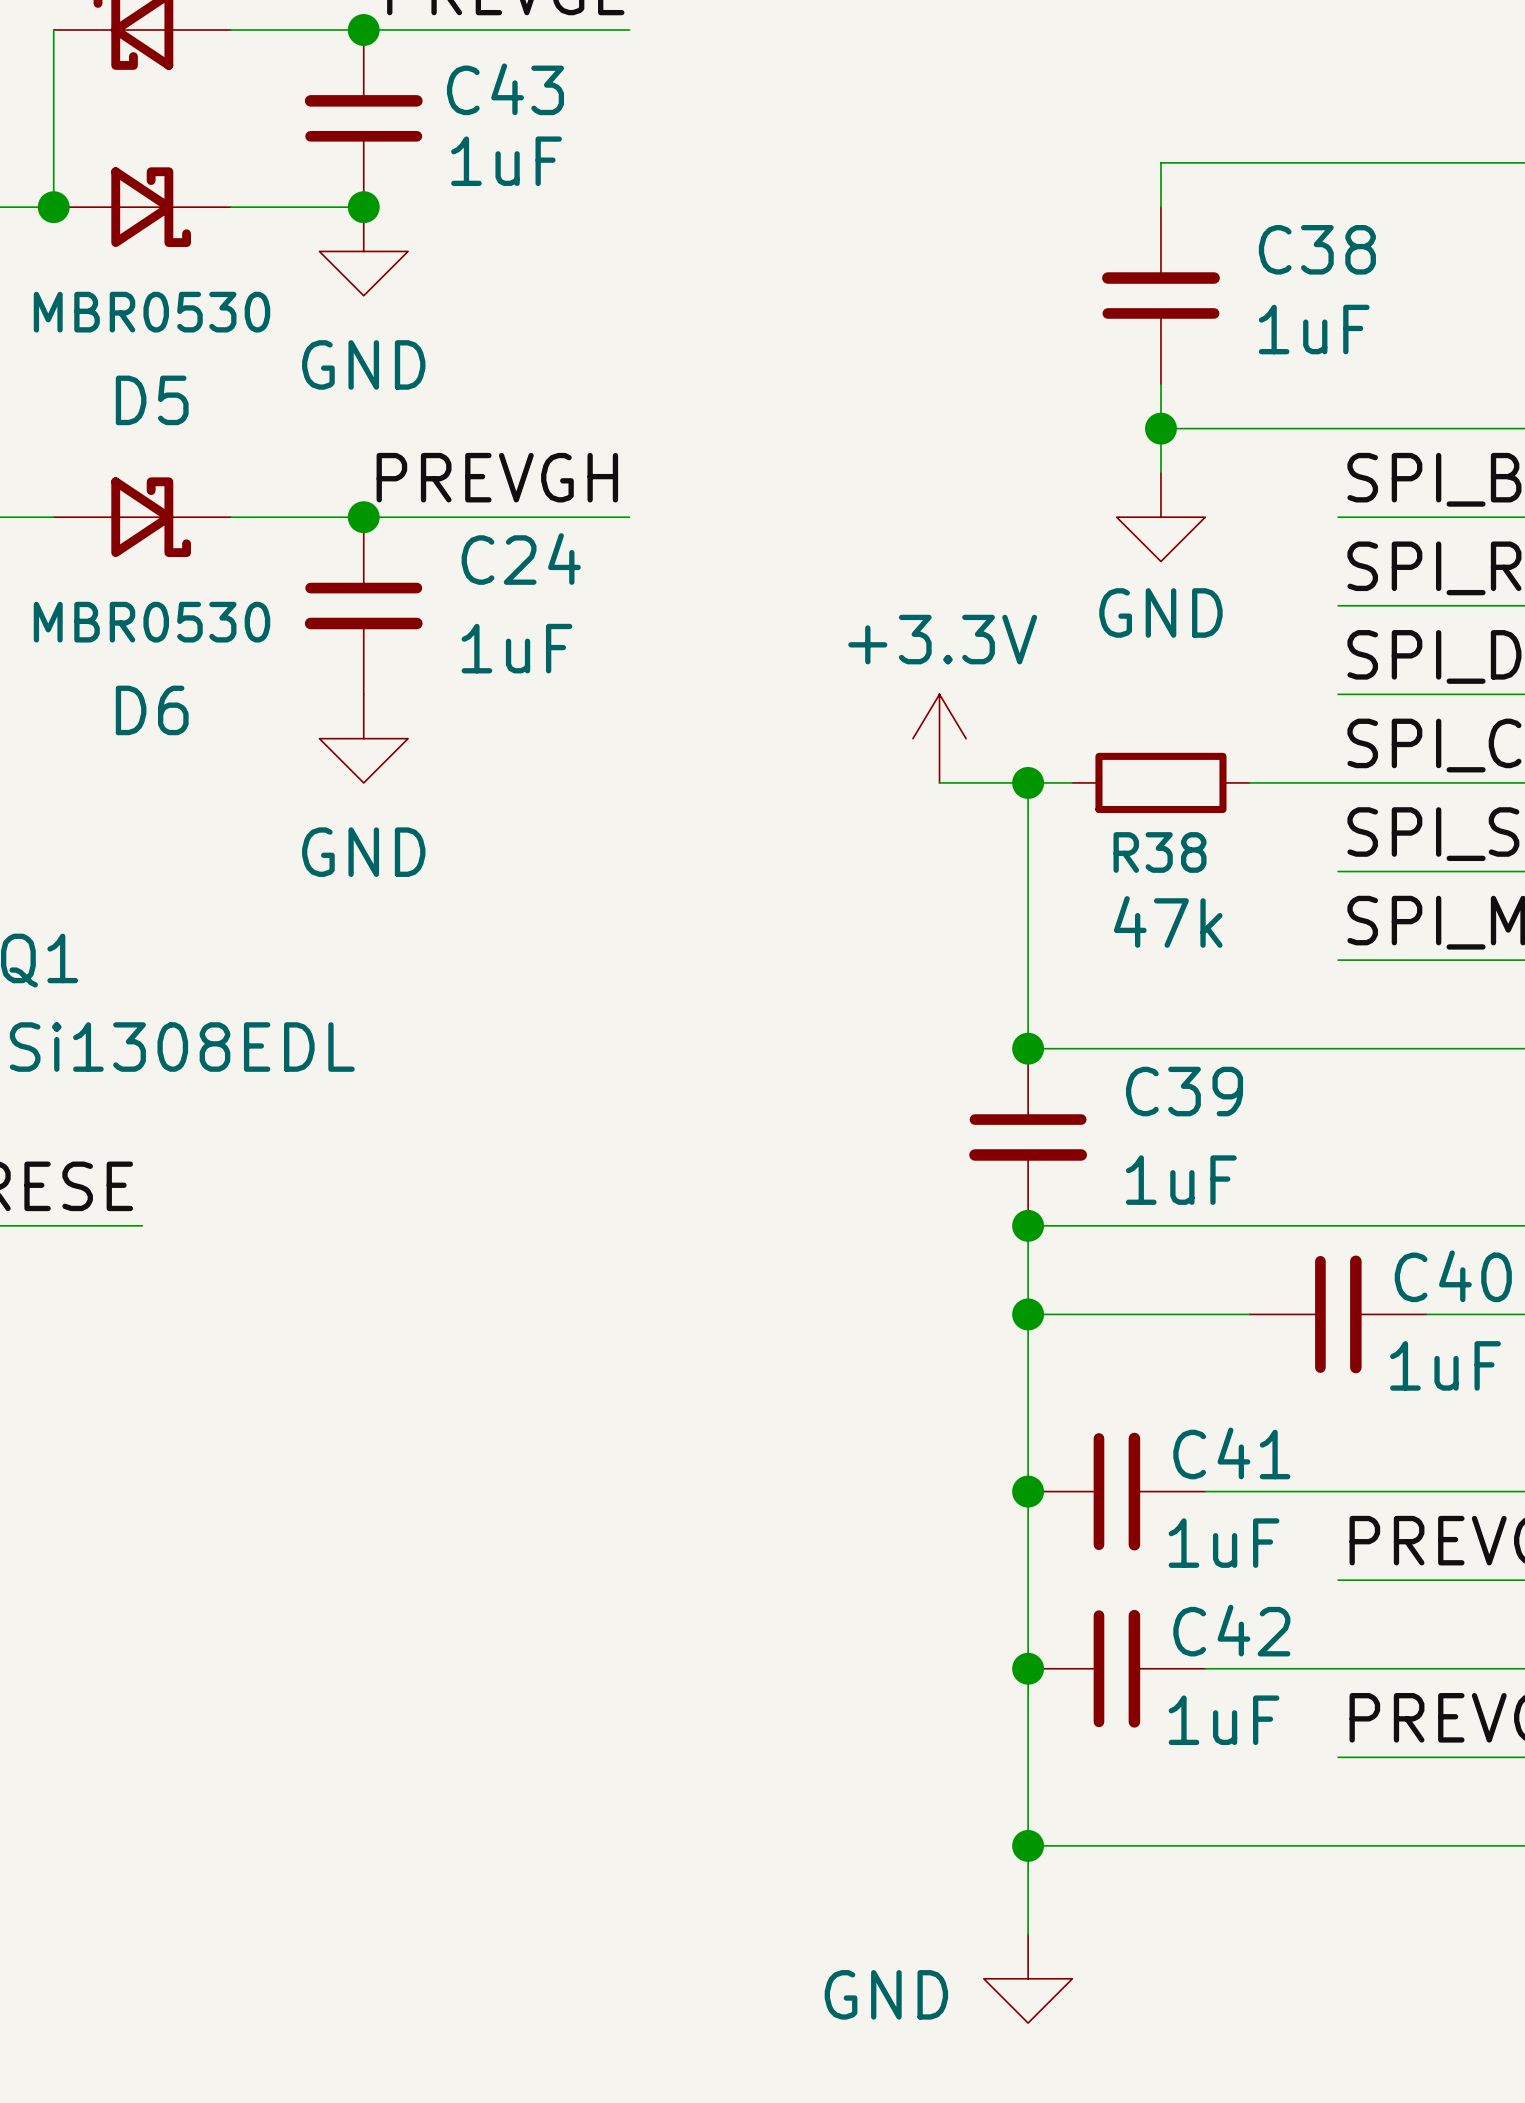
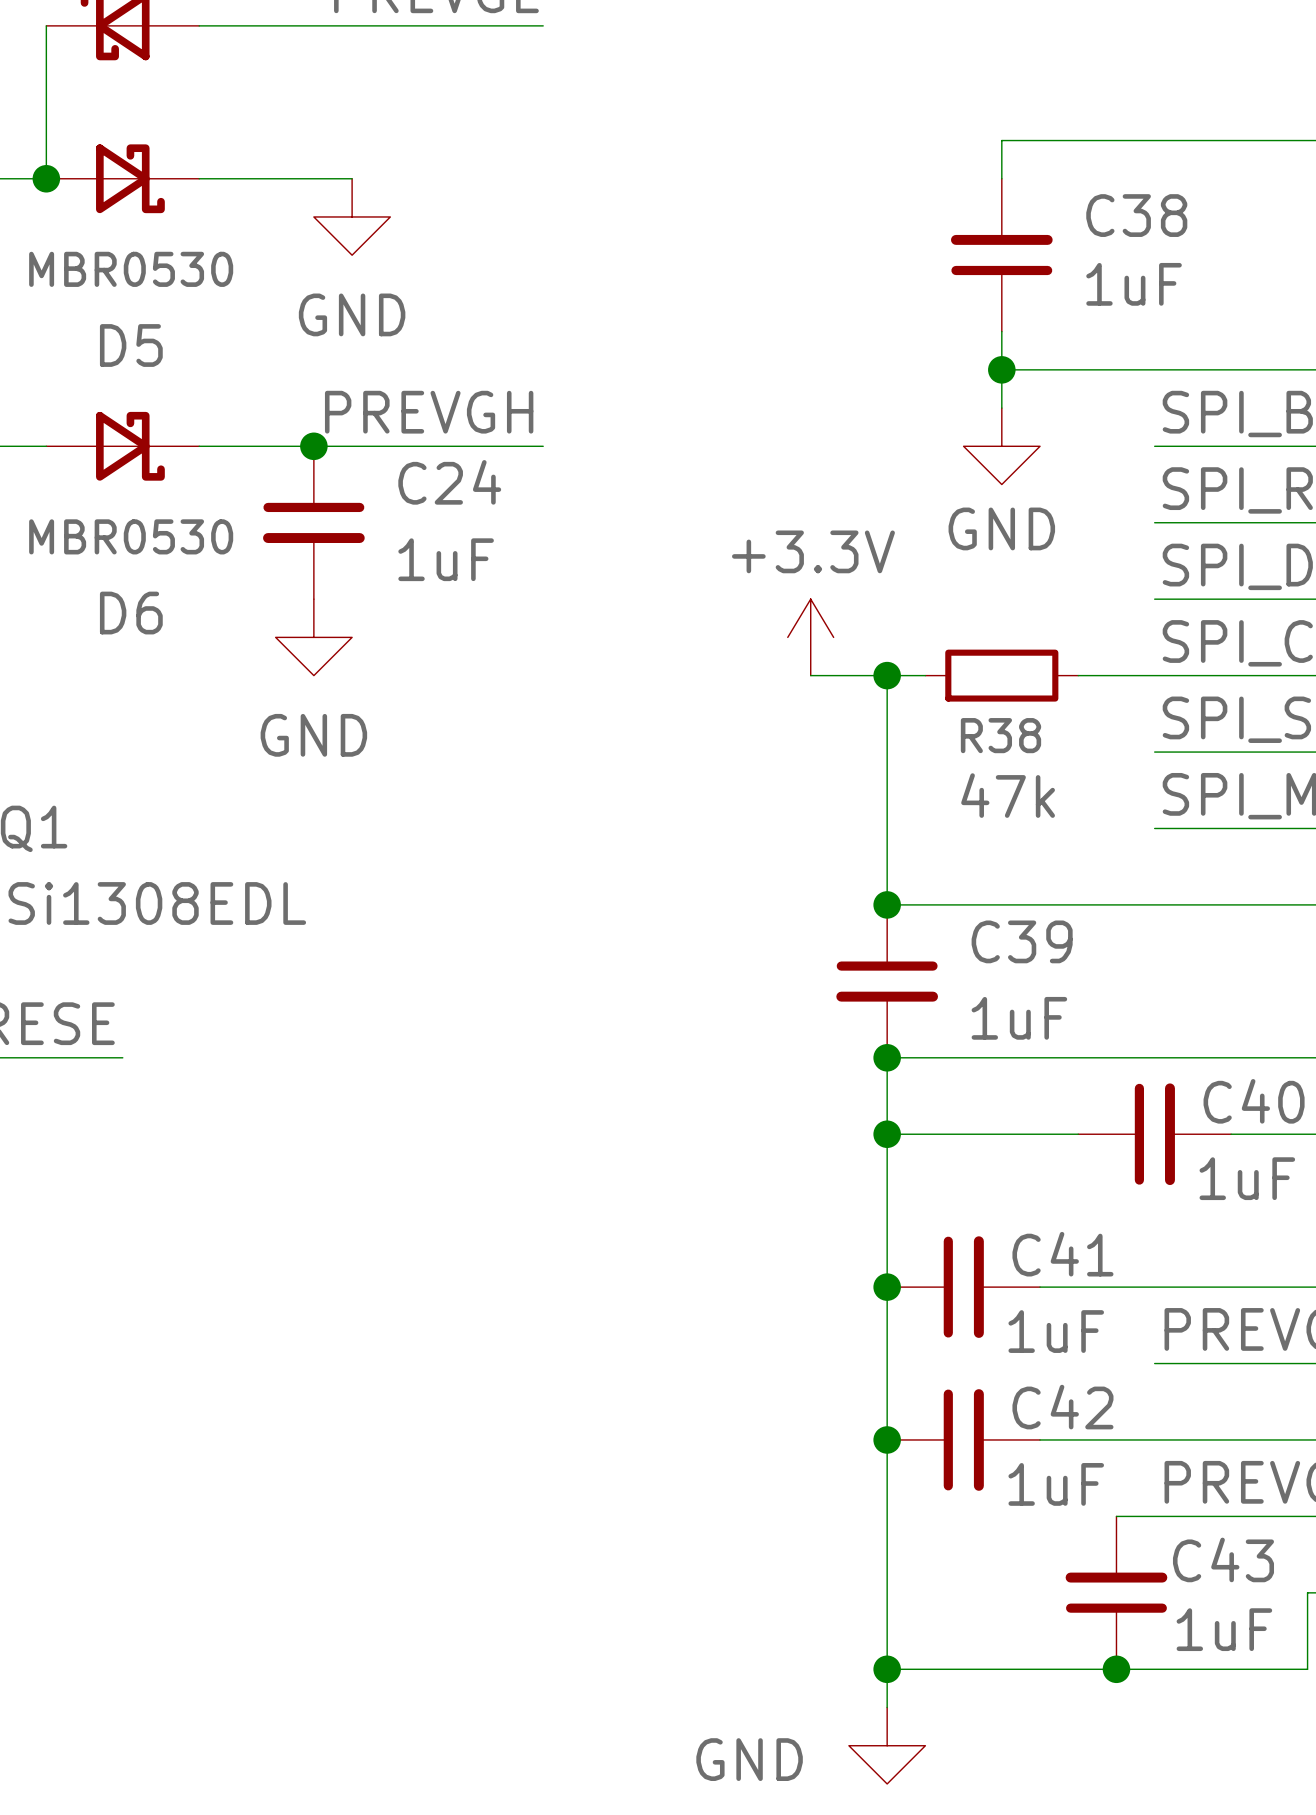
junction: (363, 30) -> none
C43 name position: C43 (505, 89) -> C43 (1223, 1559)
C43 position: (363, 118) -> (1116, 1592)
C43 value position: 1uF (506, 161) -> 1uF (1224, 1629)
wire: none -> (313, 178) (352, 178)
junction: (363, 207) -> none
power symbol position: GND (363, 251) -> GND (352, 216)
wire: none -> (1116, 1516) (1154, 1516)
wire: (1028, 1845) (1515, 1845) -> (887, 1707) (887, 1669) (1307, 1669) (1307, 1592)
junction position: (1028, 1845) -> (887, 1669)
junction: none -> (1116, 1669)
power symbol position: GND (1028, 1978) -> GND (887, 1745)
power symbol text position: GND (886, 1994) -> GND (749, 1759)

